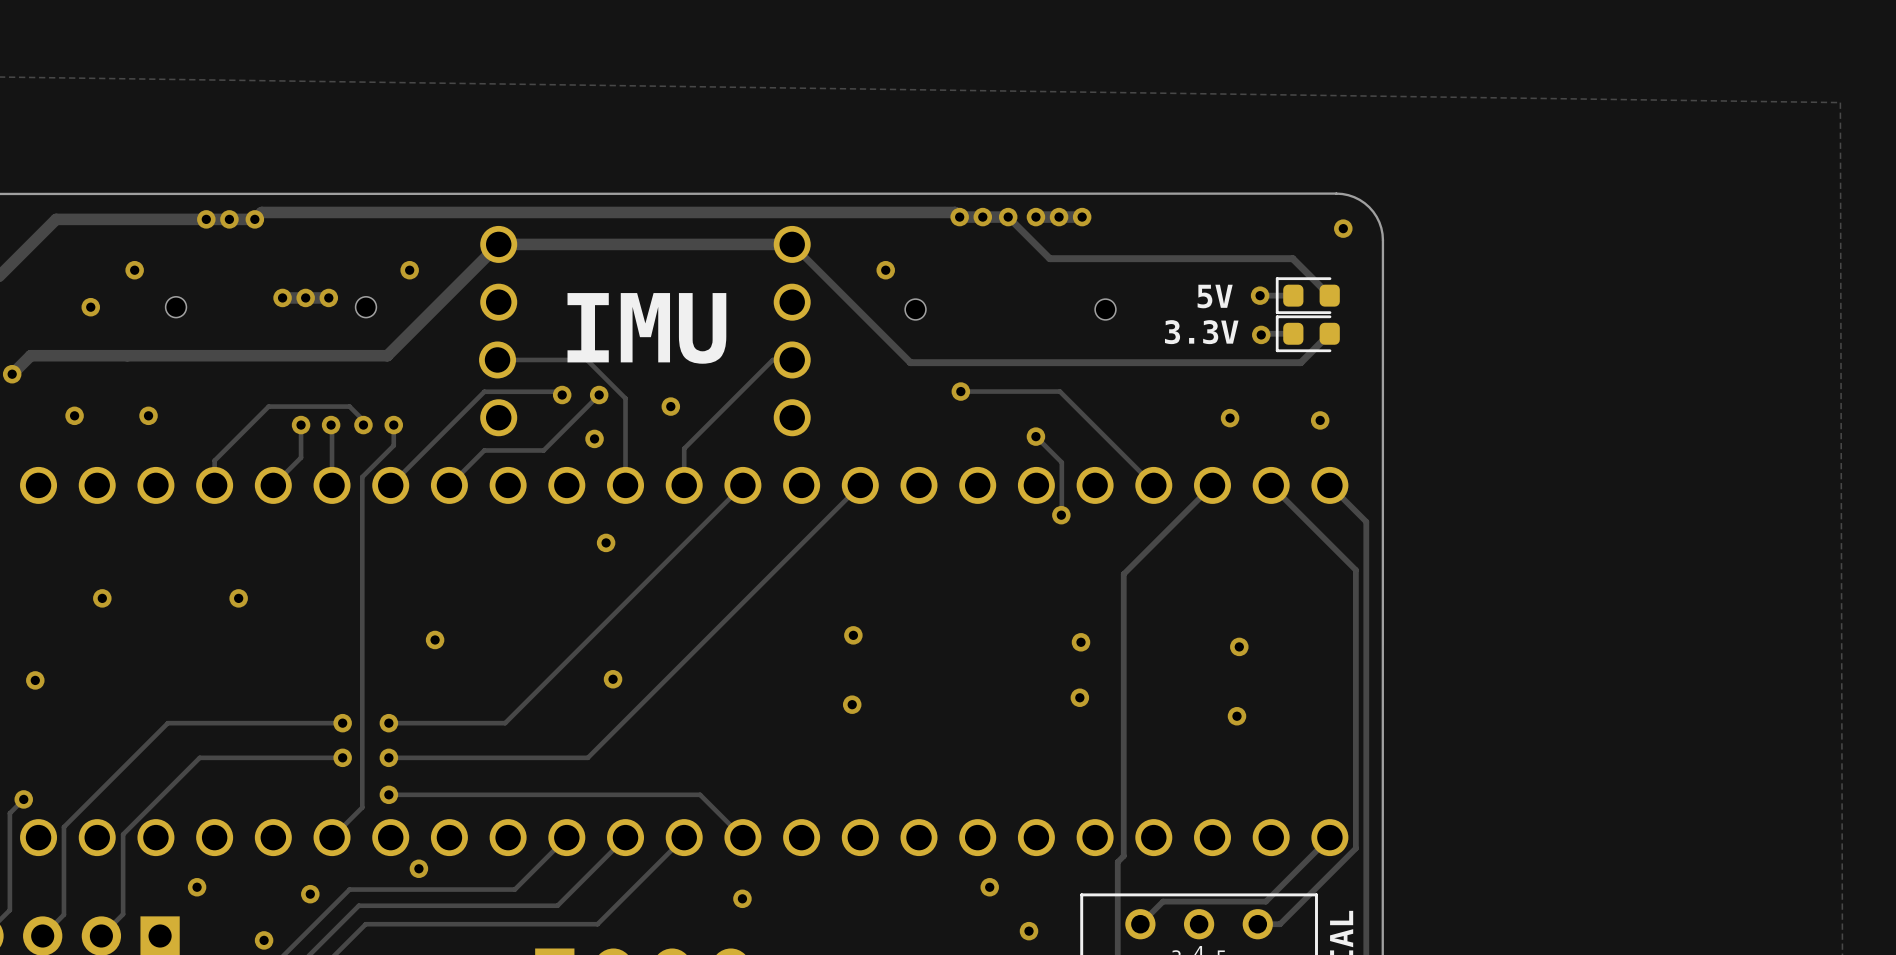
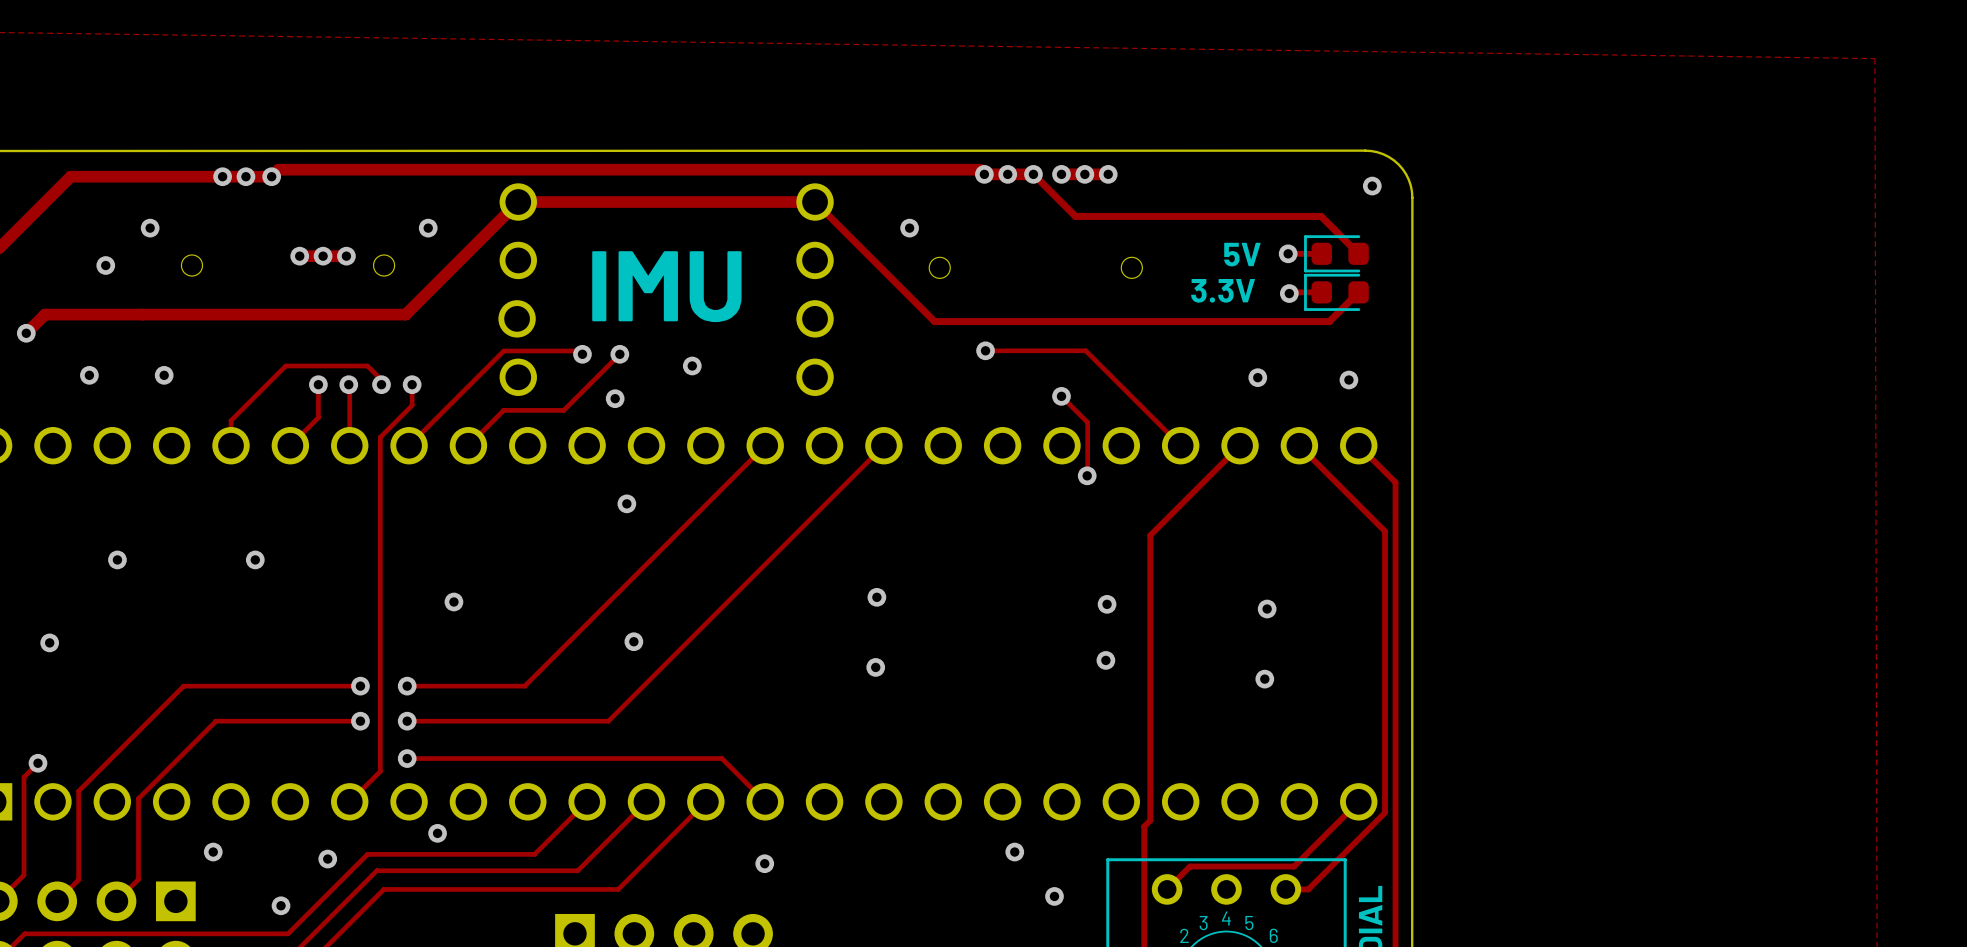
track: (497, 359) (587, 359) (625, 398) (625, 485) -> none
track: (792, 359) (772, 359) (684, 448) (684, 485) -> none

